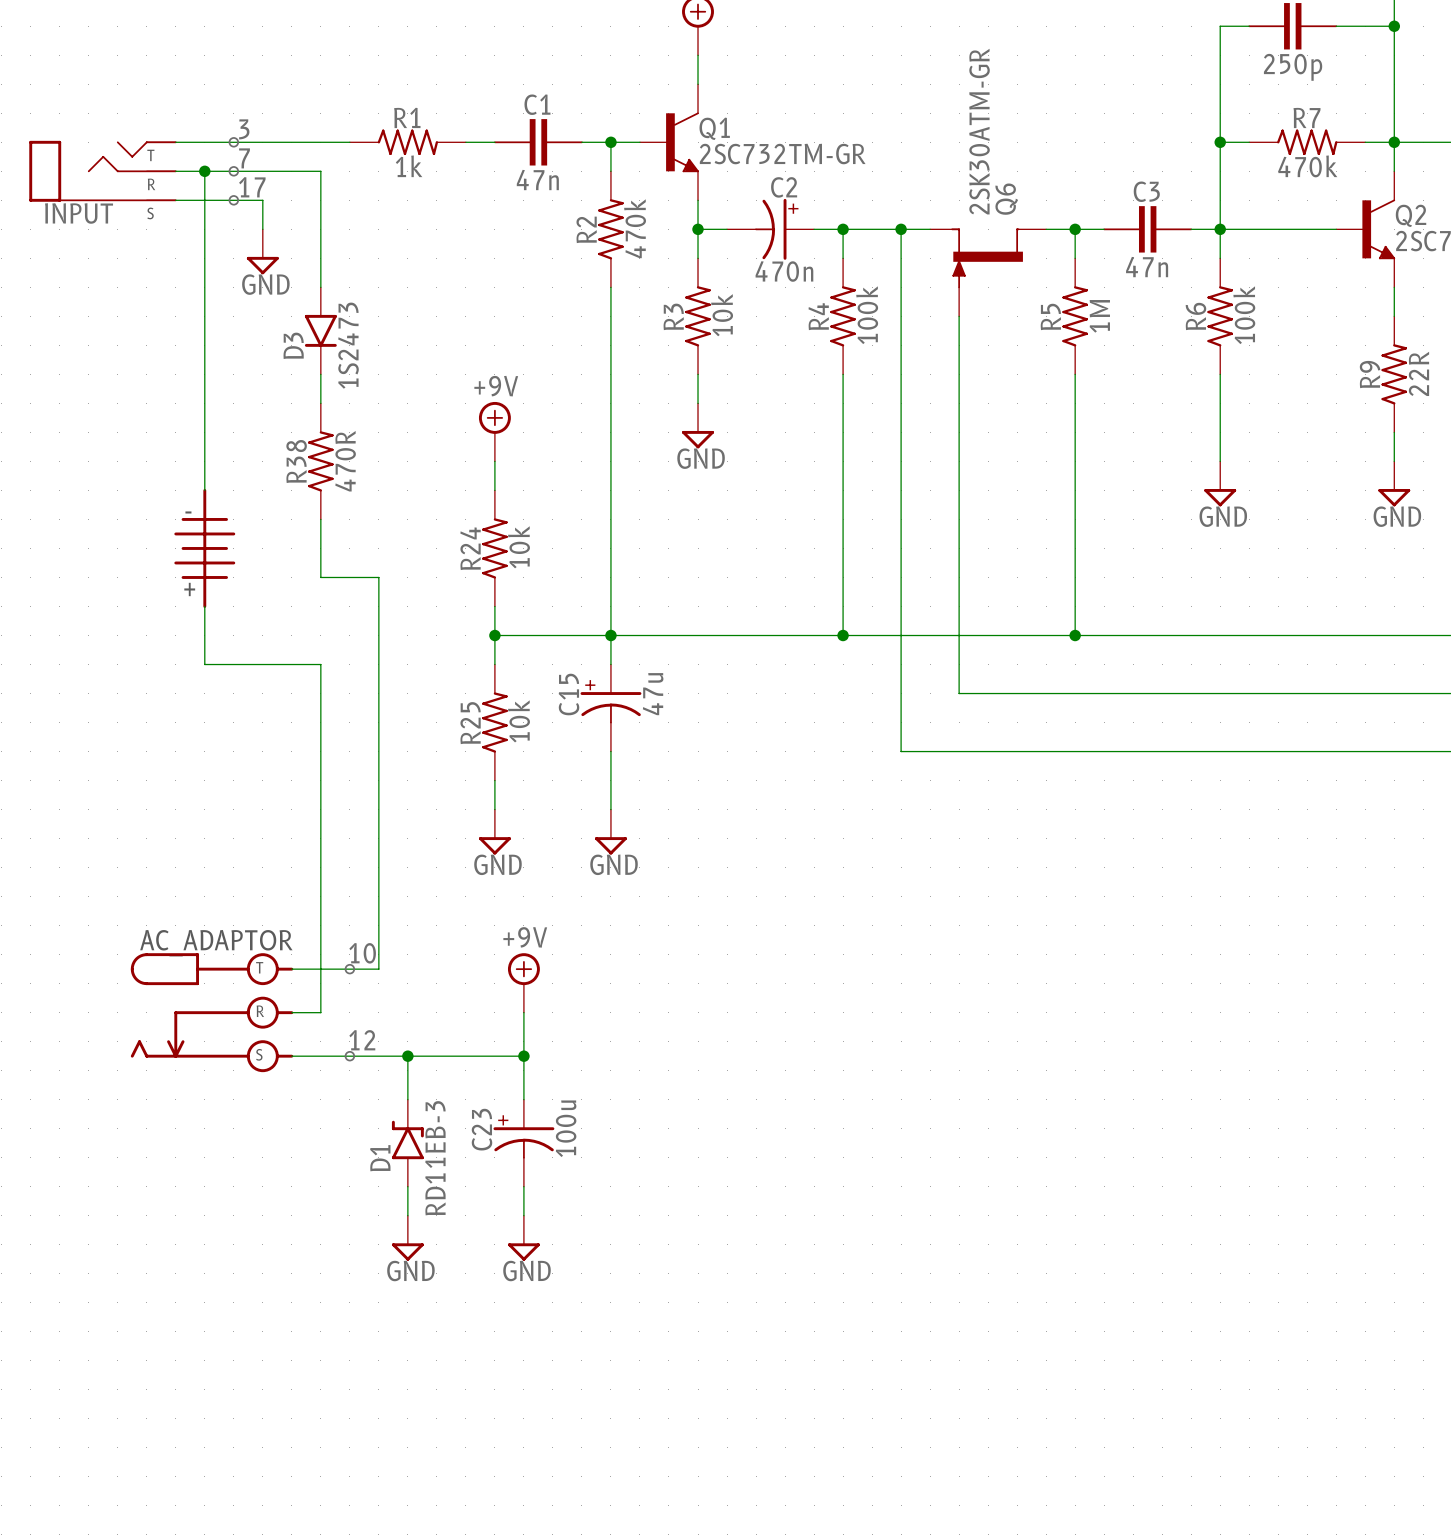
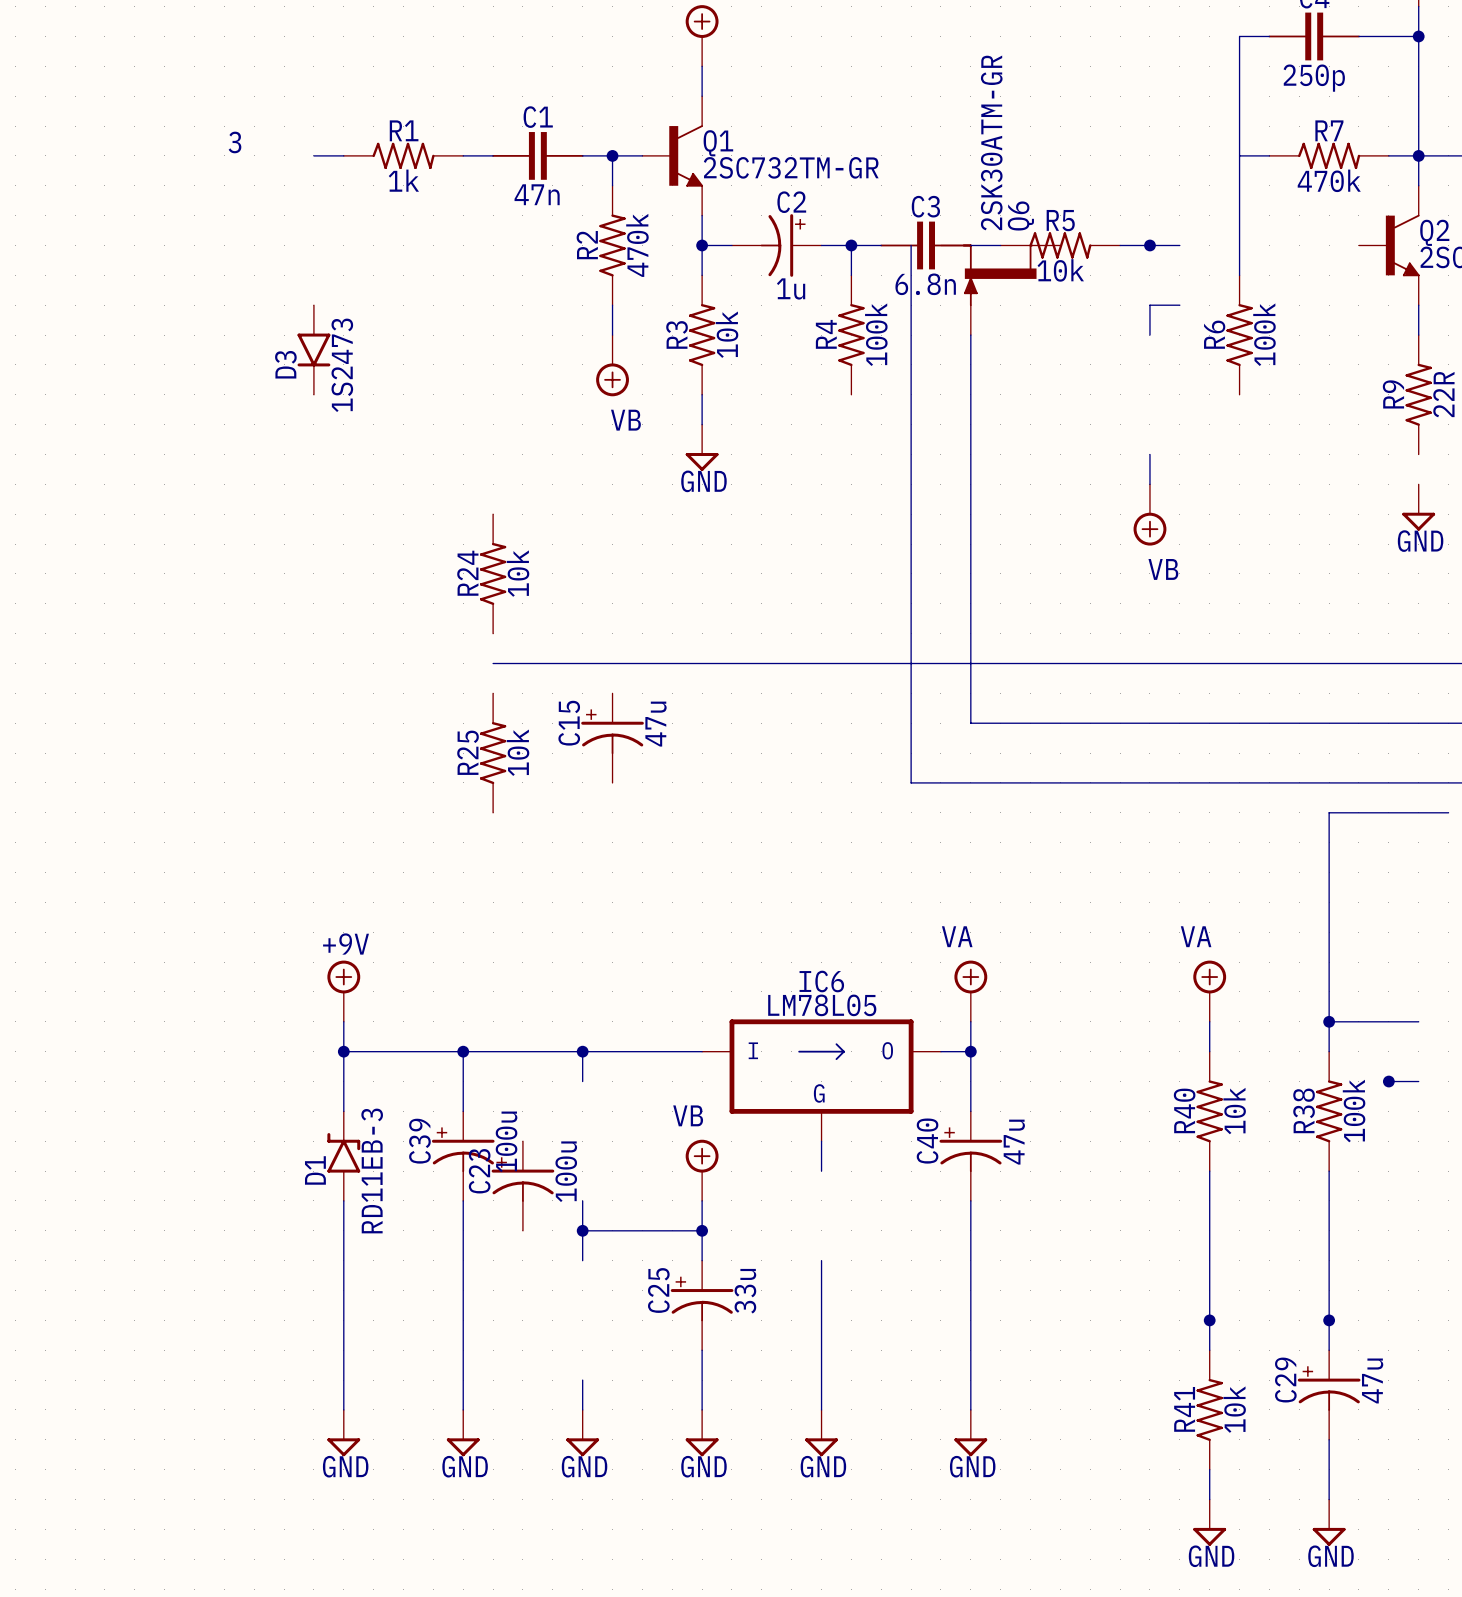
drawing: [228, 137, 240, 148] -> none
wire: (175, 142) (320, 142) -> none
junction: (1220, 142) -> none
text: 7 (244, 158) -> none
drawing: [228, 166, 240, 177] -> none
INPUT: (102, 171) -> none
wire: (175, 171) (320, 171) (320, 287) -> none
wire: (204, 171) (204, 490) -> none
junction: (204, 171) -> none
text: 17 (252, 187) -> none
drawing: [228, 195, 240, 206] -> none
wire: (175, 200) (262, 200) (262, 229) -> none
junction: (901, 229) -> none
wire: none -> (970, 245) (1000, 245)
wire: (1075, 229) (1075, 258) -> (1149, 454) (1149, 484)
junction: (1075, 229) -> none
junction: none -> (1149, 245)
C3 position: (1147, 229) -> (926, 245)
wire: (1191, 229) (1336, 229) -> none
junction: (1220, 229) -> none
power symbol: GND (262, 251) -> none
C3 value: 47n (1147, 267) -> 6.8n (925, 284)
C2 value: 470n (784, 271) -> 1u (791, 288)
wire: none -> (1179, 305) (1149, 305) (1149, 335)
wire: (610, 316) (610, 664) -> none
R5 rotation: 0° (1075, 316) -> 90° clockwise (1060, 245)
R5 position: (1075, 316) -> (1060, 245)
R5 value: 1M (1099, 316) -> 10k (1060, 270)
power symbol: none -> VB (612, 365)
wire: (320, 374) (320, 403) -> none
wire: (843, 374) (843, 635) -> none
wire: (1075, 374) (1075, 635) -> none
wire: (1220, 374) (1220, 461) -> none
power symbol: +9V (494, 431) -> none
wire: (1394, 432) (1394, 461) -> none
R38 position: (320, 461) -> (1329, 1111)
R38 value: 470R (345, 461) -> 100k (1354, 1111)
wire: (494, 461) (494, 490) -> none
power symbol: GND (1220, 483) -> none
power symbol: none -> VB (1149, 514)
wire: (320, 519) (320, 577) (378, 577) (378, 969) (291, 969) -> none
part: (204, 548) -> none
wire: (204, 606) (204, 664) (320, 664) (320, 1012) (291, 1012) -> none
wire: (494, 606) (494, 664) -> none
junction: (494, 635) -> none
junction: (610, 635) -> none
junction: (843, 635) -> none
junction: (1075, 635) -> none
wire: (610, 751) (610, 809) -> none
wire: (494, 780) (494, 809) -> none
wire: none -> (1448, 812) (1329, 812) (1329, 1051)
power symbol: GND (494, 832) -> none
power symbol: GND (610, 832) -> none
text: 10 (362, 953) -> none
power symbol: none -> VA (970, 991)
power symbol: none -> VA (1209, 991)
drawing: [344, 963, 356, 975] -> none
power symbol position: +9V (523, 982) -> +9V (343, 991)
wire: none -> (970, 1021) (970, 1111)
wire: none -> (1209, 1021) (1209, 1051)
wire: none -> (1329, 1021) (1418, 1021)
junction: none -> (1329, 1021)
AC_ADAPTOR: (212, 1012) -> none
wire: none -> (343, 1051) (702, 1051)
junction: none -> (343, 1051)
wire: none -> (463, 1051) (463, 1111)
junction: none -> (463, 1051)
wire: (523, 1012) (523, 1099) -> (343, 1021) (343, 1111)
junction: none -> (582, 1051)
wire: none -> (940, 1051) (970, 1051)
junction: none -> (970, 1051)
text: 12 (362, 1040) -> none
IC6: none -> LM78L05 (821, 1080)
wire: none -> (1388, 1081) (1418, 1081)
junction: none -> (1388, 1081)
drawing: [344, 1050, 356, 1062] -> none
wire: (291, 1056) (523, 1056) -> none
wire: (407, 1056) (407, 1099) -> none
junction: (407, 1056) -> none
junction: (523, 1056) -> none
R40: none -> 10k (1209, 1111)
wire: none -> (821, 1141) (821, 1171)
C39: none -> 100u (463, 1156)
C40: none -> 47u (970, 1156)
power symbol: none -> VB (702, 1170)
wire: none -> (1209, 1171) (1209, 1350)
wire: none -> (1329, 1171) (1329, 1350)
D1 position: (407, 1143) -> (343, 1156)
wire: none -> (343, 1200) (343, 1409)
wire: none -> (463, 1200) (463, 1409)
wire: none -> (582, 1200) (582, 1260)
wire: none -> (702, 1200) (702, 1260)
wire: none -> (970, 1200) (970, 1409)
wire: (407, 1186) (407, 1215) -> (582, 1051) (582, 1081)
wire: (523, 1186) (523, 1215) -> (582, 1380) (582, 1409)
wire: none -> (582, 1230) (702, 1230)
junction: none -> (582, 1230)
junction: none -> (702, 1230)
wire: none -> (821, 1260) (821, 1409)
power symbol: GND (407, 1238) -> none
power symbol: GND (523, 1238) -> none
C25: none -> 33u (702, 1305)
junction: none -> (1209, 1320)
junction: none -> (1329, 1320)
wire: none -> (702, 1350) (702, 1409)
C29: none -> 47u (1329, 1395)
R41: none -> 10k (1209, 1409)
power symbol: none -> GND (343, 1433)
power symbol: none -> GND (463, 1433)
power symbol: none -> GND (582, 1433)
power symbol: none -> GND (702, 1433)
power symbol: none -> GND (821, 1433)
power symbol: none -> GND (970, 1433)
wire: none -> (1329, 1439) (1329, 1499)
wire: none -> (1209, 1469) (1209, 1499)
power symbol: none -> GND (1209, 1522)
power symbol: none -> GND (1329, 1522)

